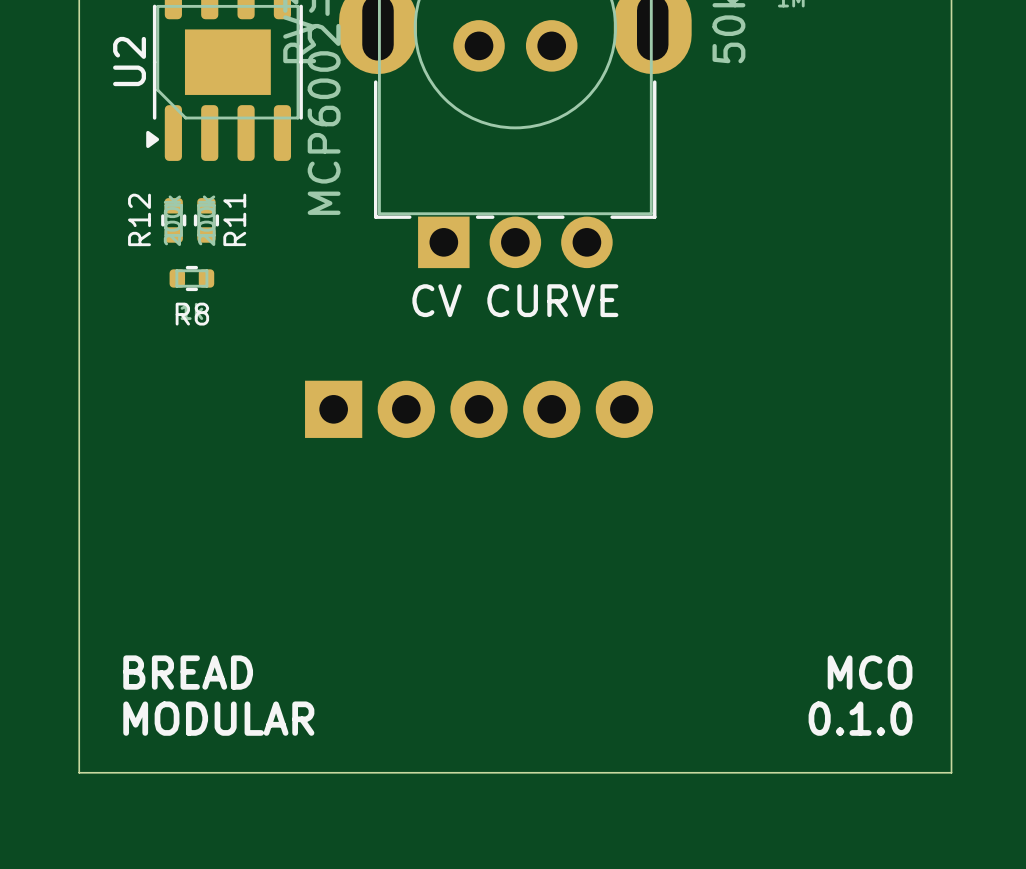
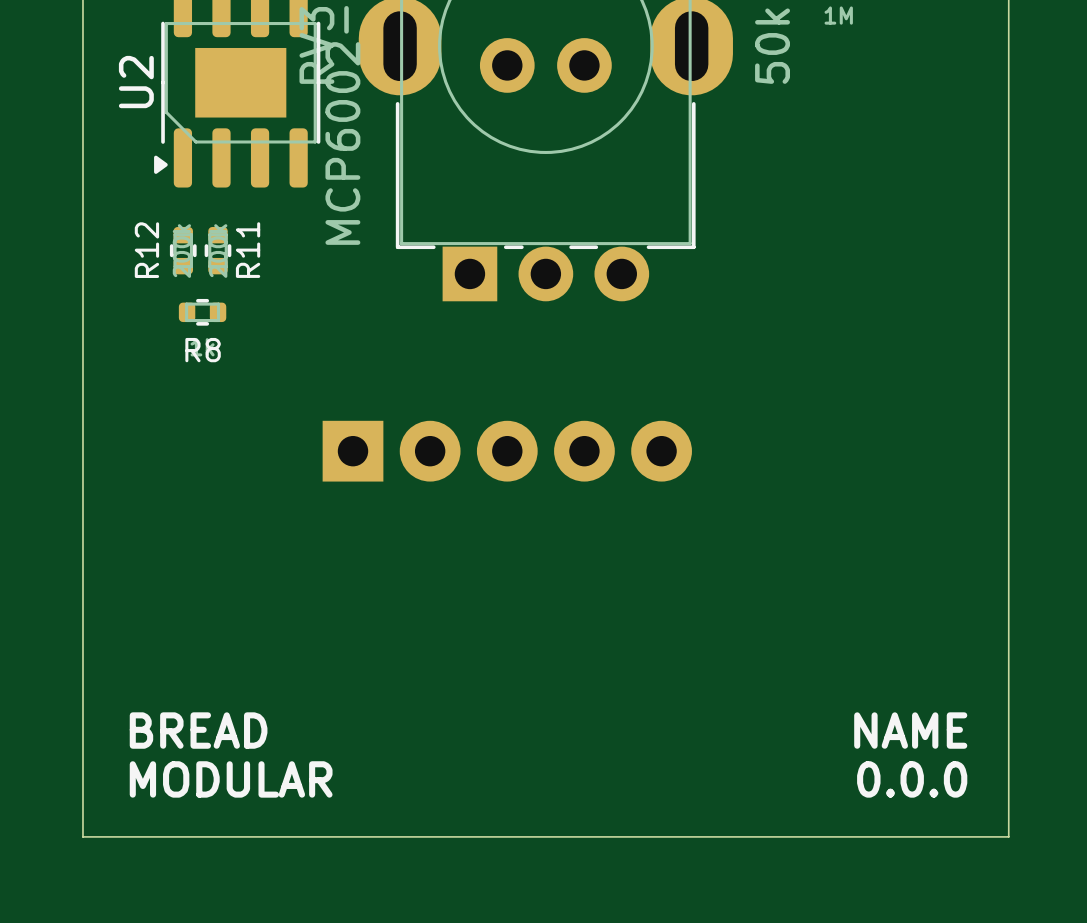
text: CV CURVE (515, 300) -> none
text: MCO (870, 672) -> NAME (910, 730)
text: 0.1.0 (860, 718) -> 0.0.0 (912, 779)

